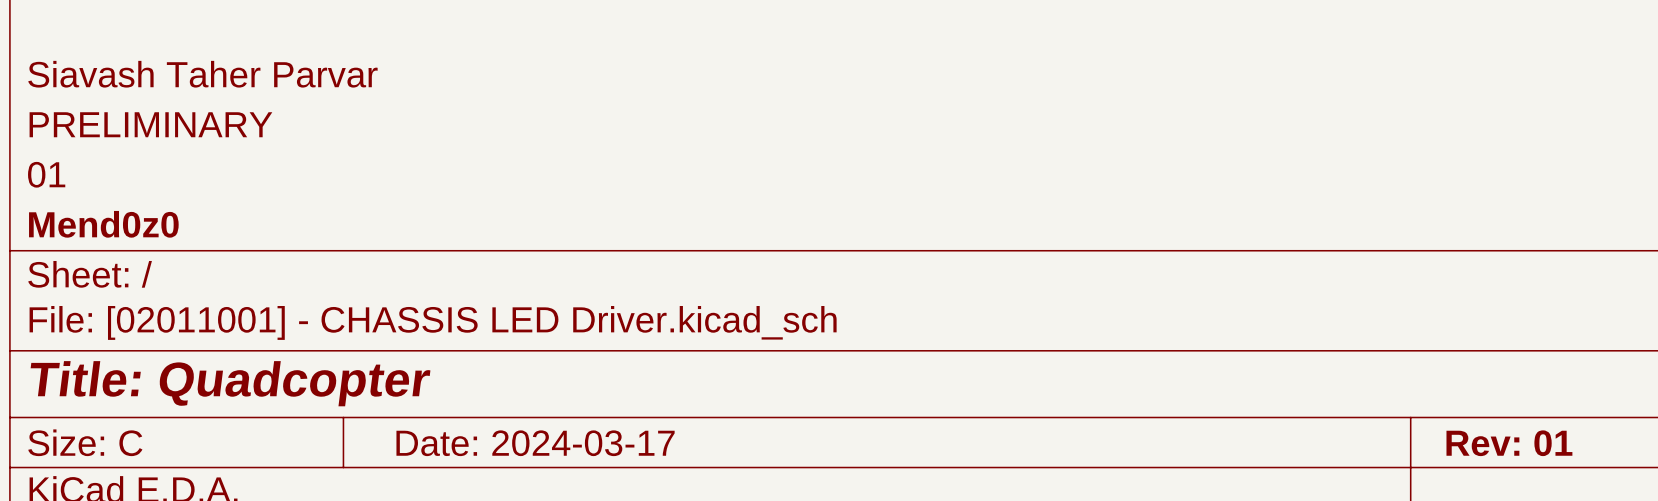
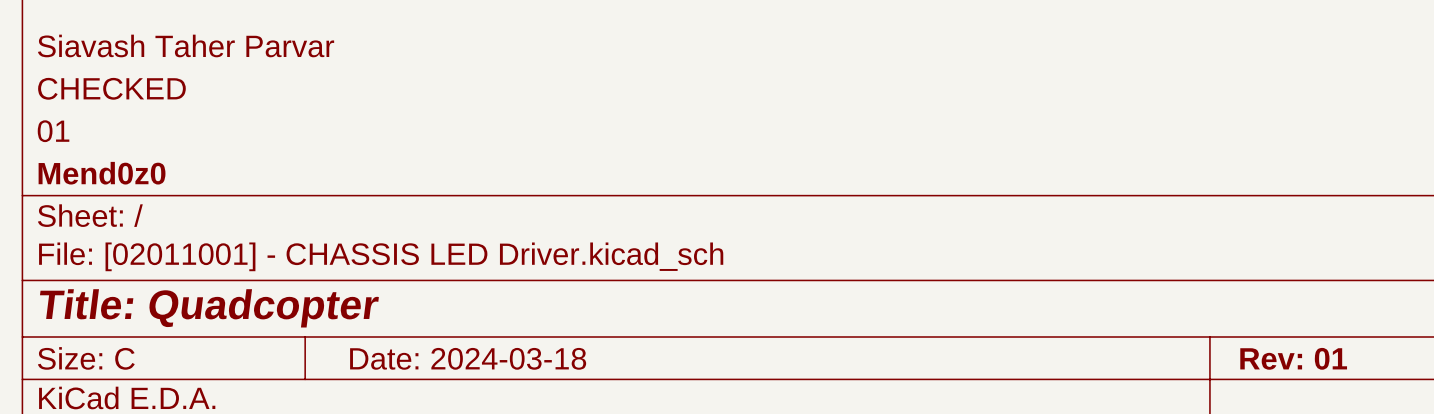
title block: PRELIMINARY (150, 124) -> CHECKED (111, 88)
title block: Date: 2024-03-17 (535, 443) -> Date: 2024-03-18 (468, 358)

